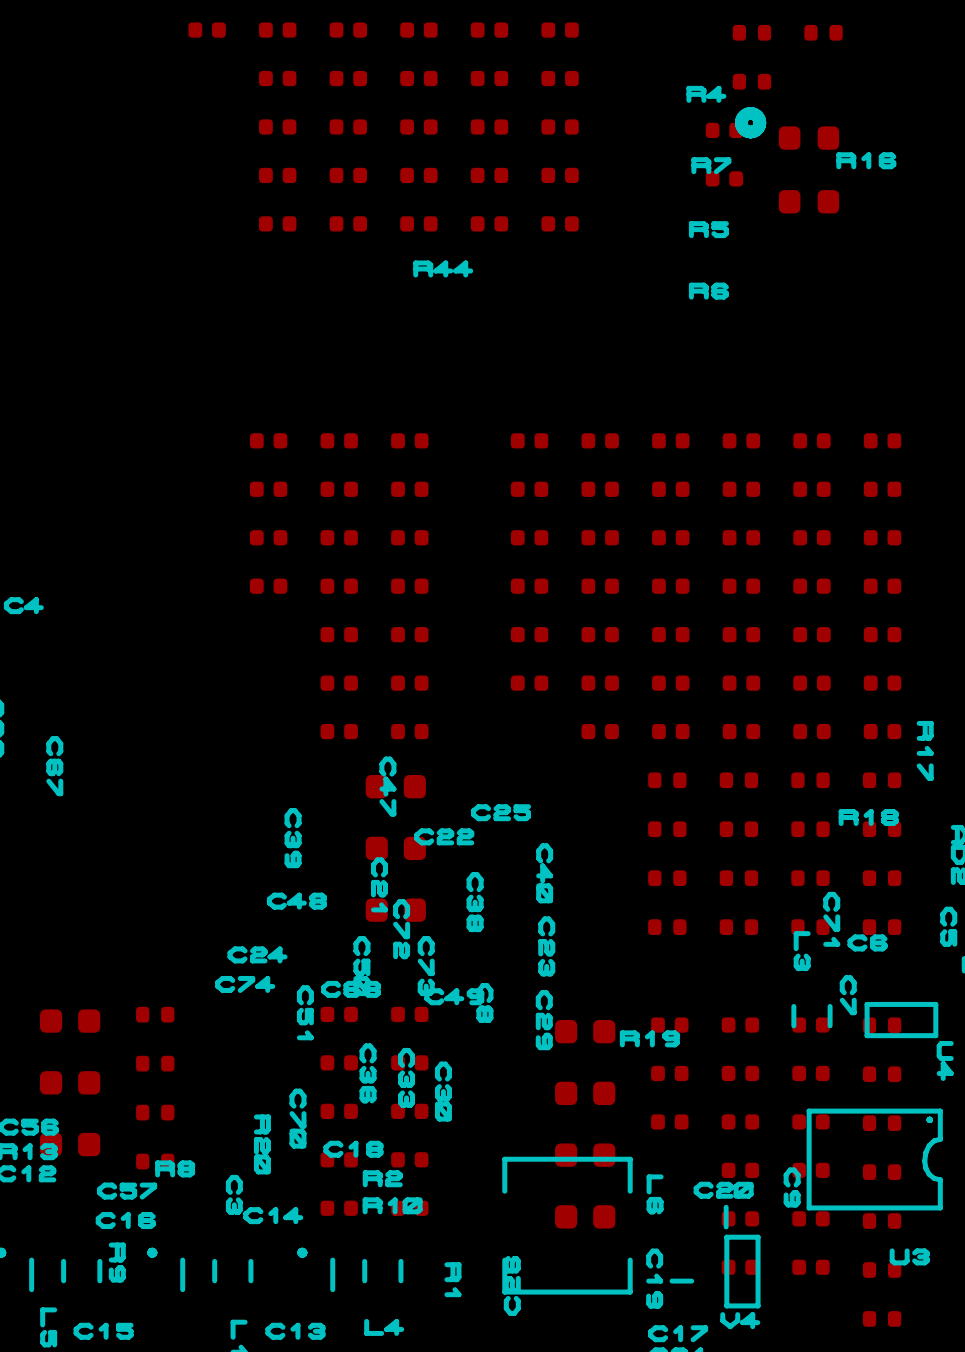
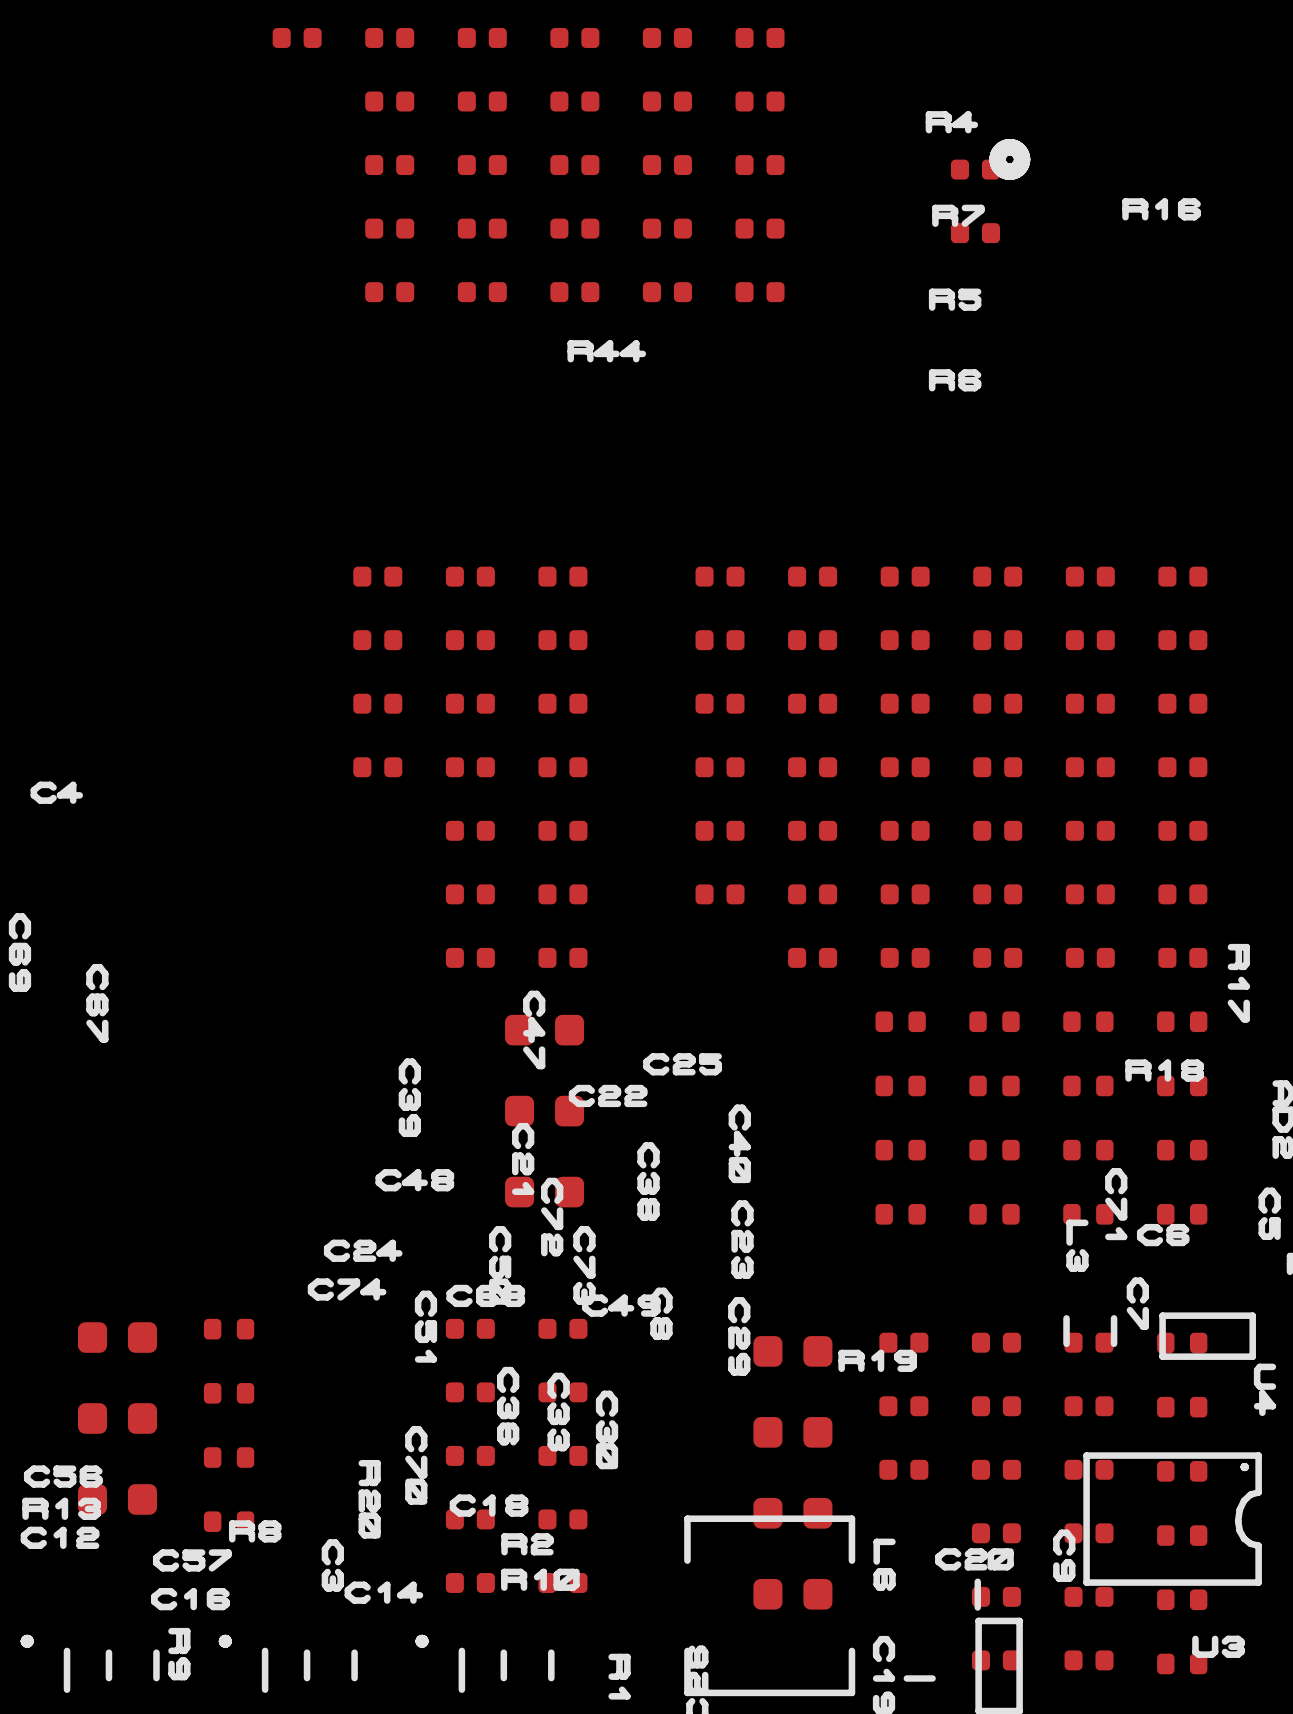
part: (751, 32) -> none
part: (823, 32) -> none
part: (751, 81) -> none
part: (809, 138) -> none
part: (809, 201) -> none

